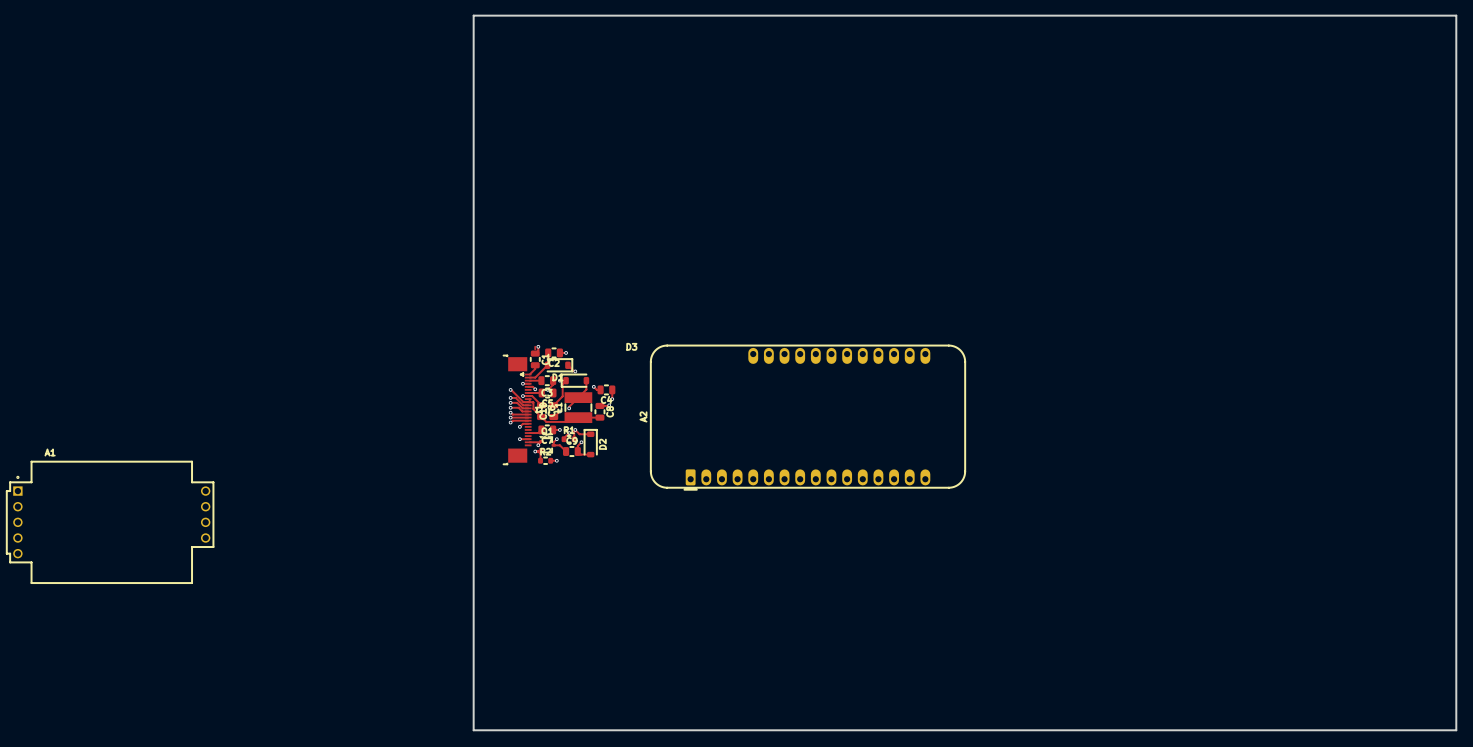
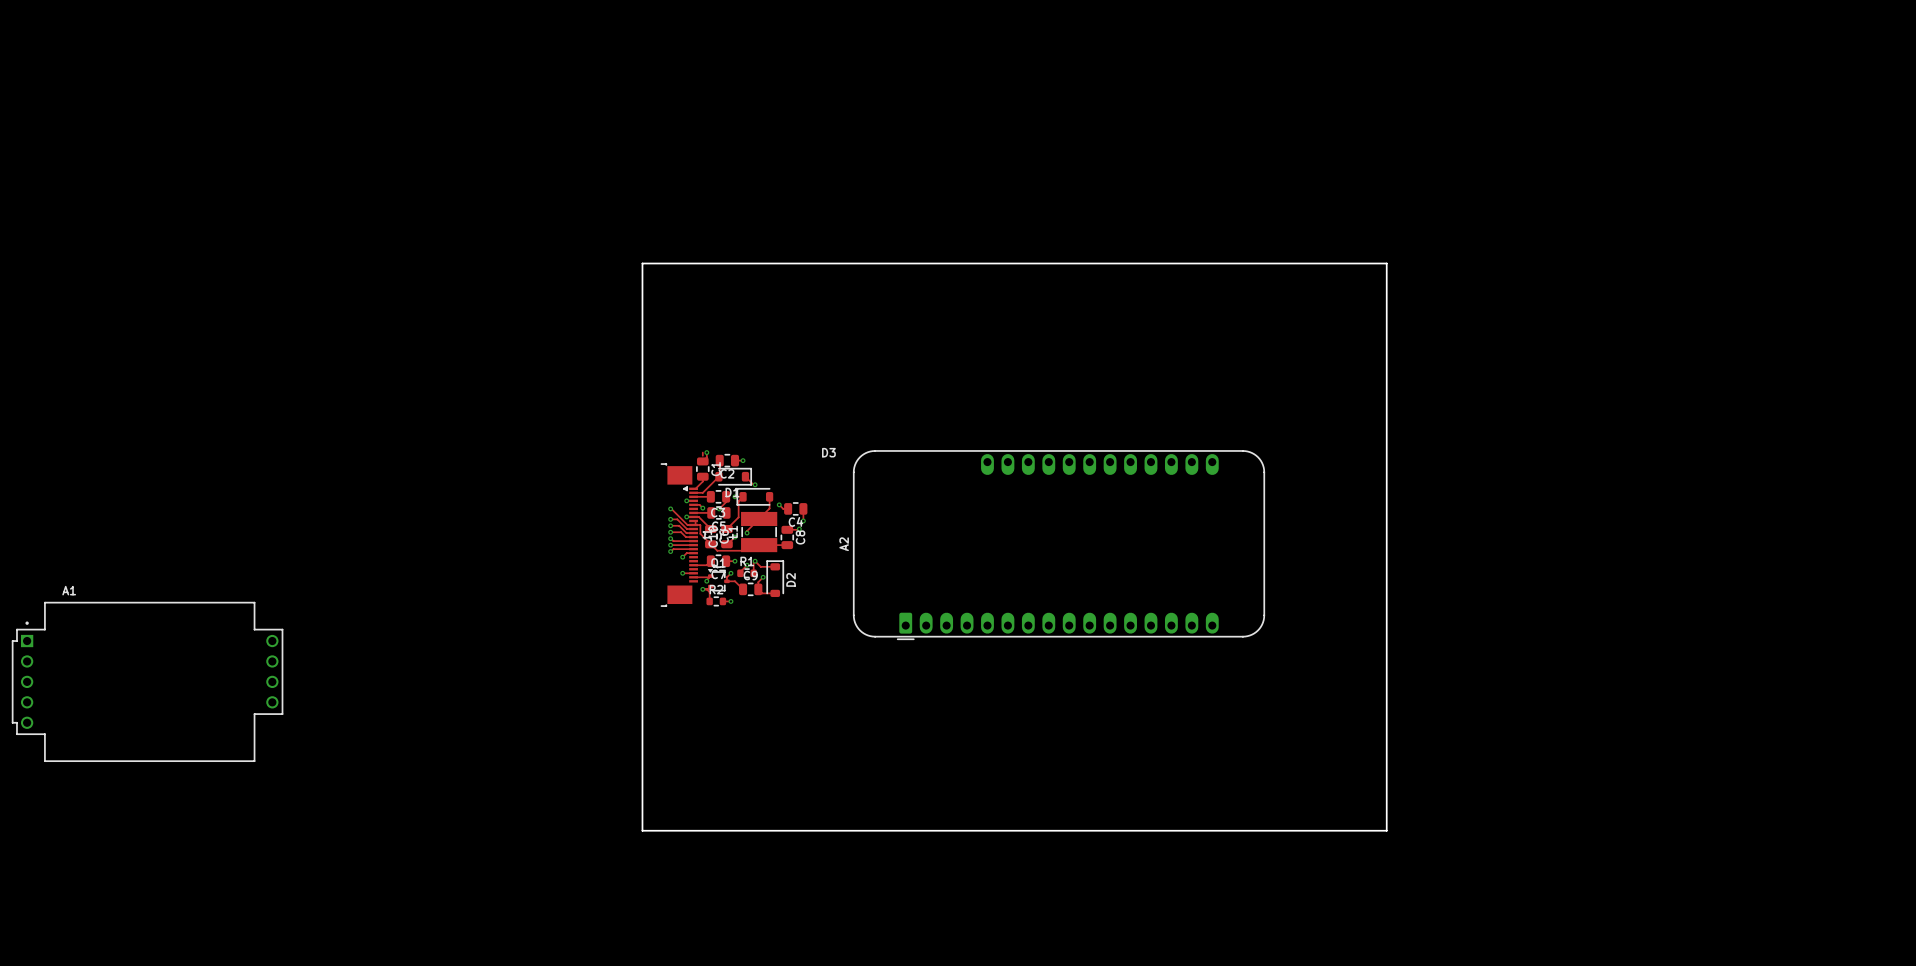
board edge: (473, 15) (1456, 15) (1456, 730) (473, 730) (473, 15) -> none
board edge: none -> (642, 263) (1386, 263) (1386, 830) (642, 830) (642, 263)

